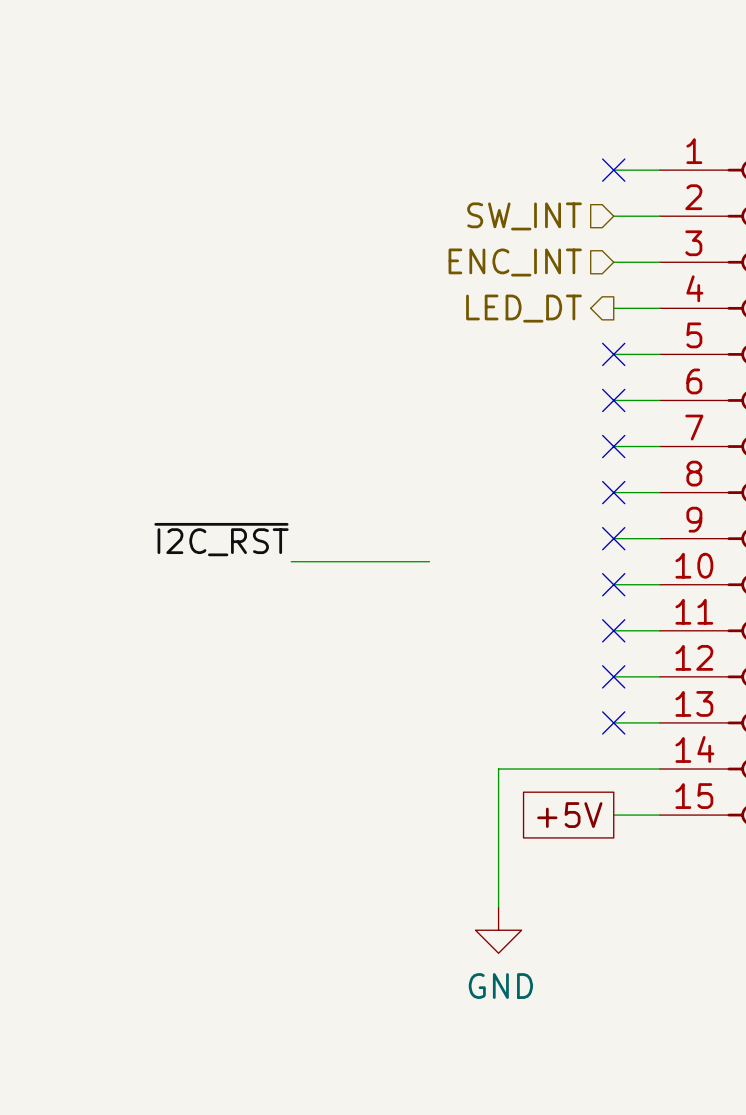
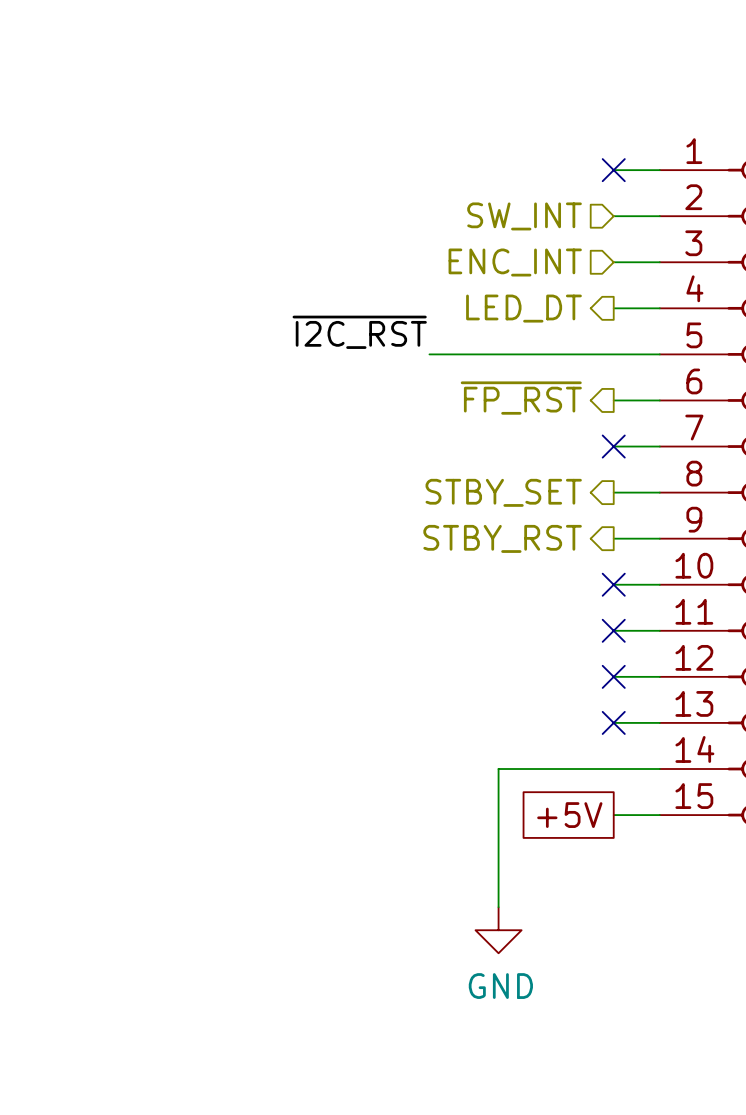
wire: none -> (429, 354) (613, 354)
no-connect mark: (613, 354) -> none
hierarchical label: none -> ~{FP_RST} (521, 398)
no-connect mark: (613, 400) -> none
hierarchical label: none -> STBY_SET (503, 492)
no-connect mark: (613, 492) -> none
hierarchical label: none -> STBY_RST (502, 538)
no-connect mark: (613, 538) -> none
label position: ~{I2C_RST} (221, 539) -> ~{I2C_RST} (359, 332)
wire: (291, 561) (429, 561) -> none

